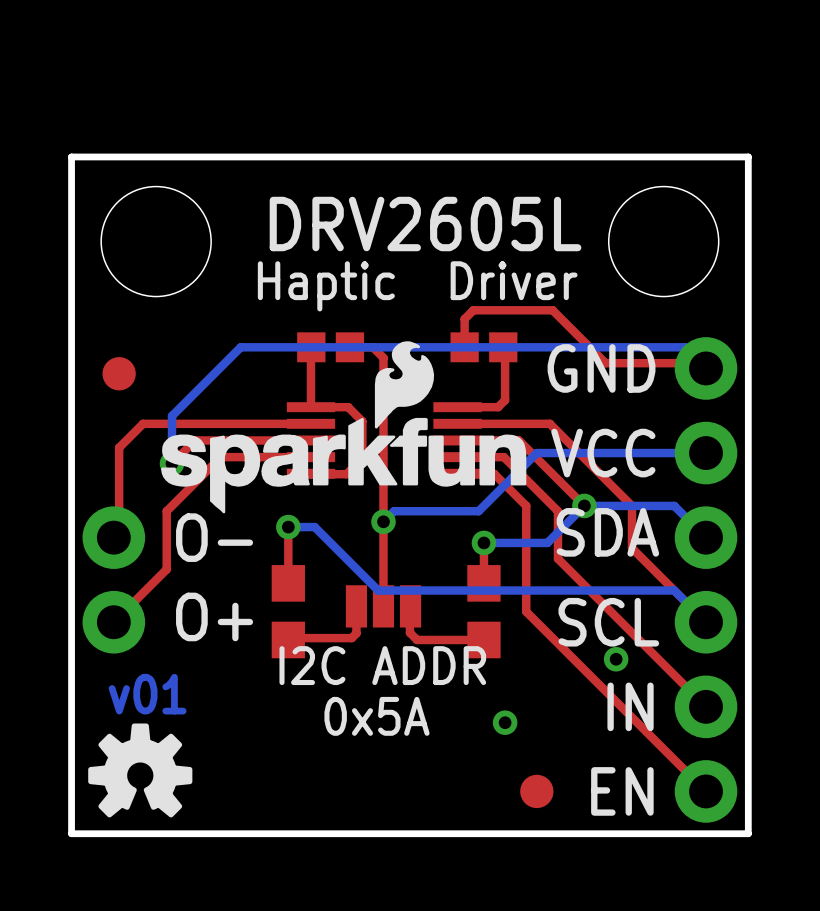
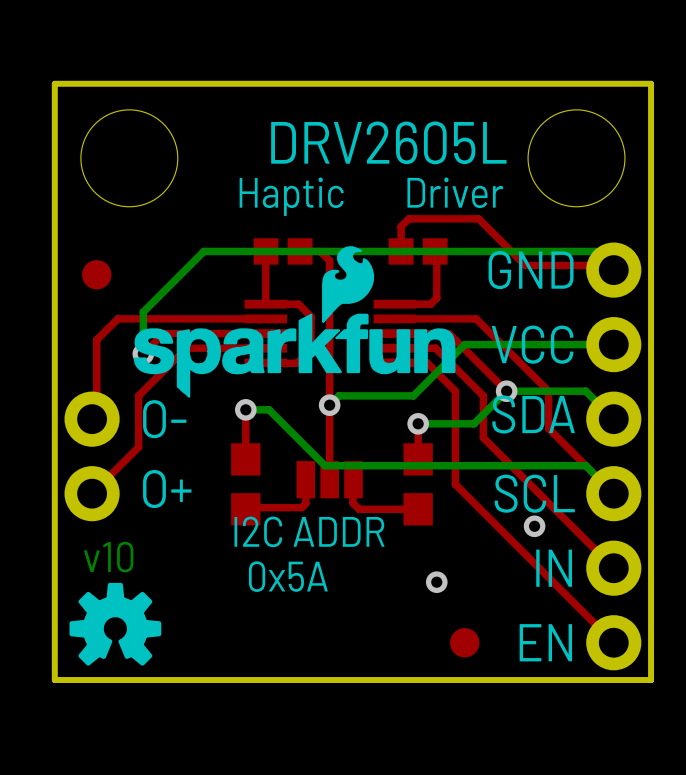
text: v01 (147, 694) -> v10 (108, 557)

